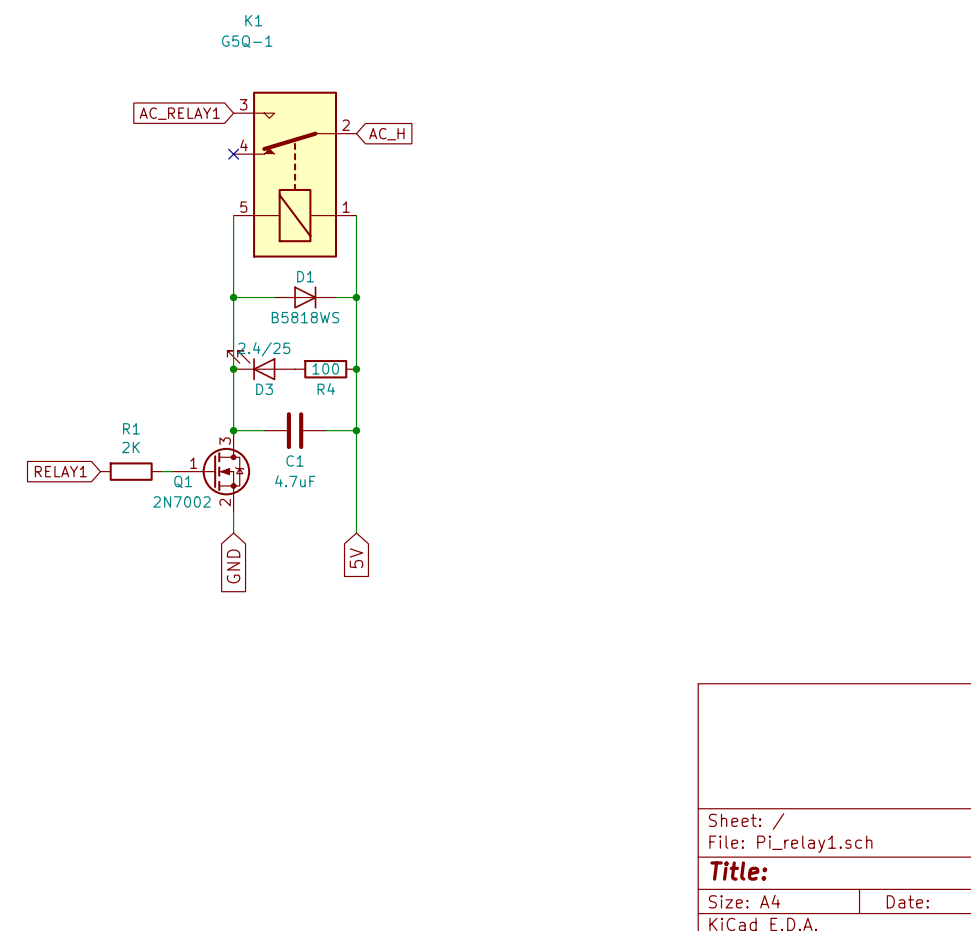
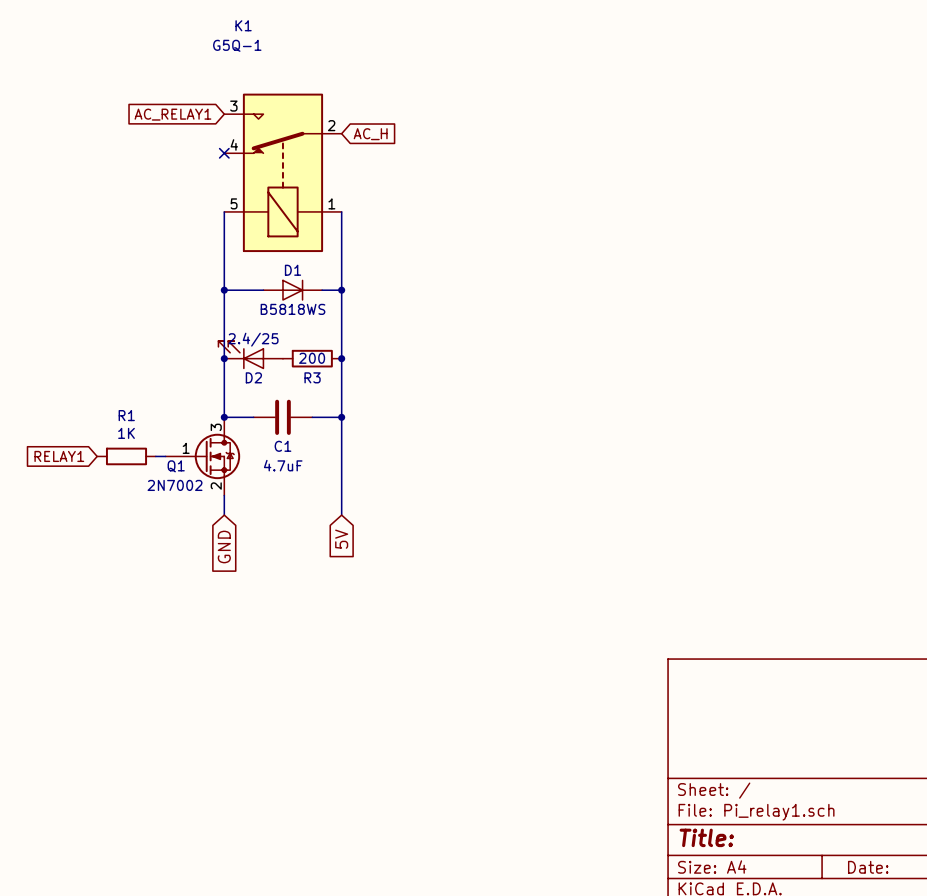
R4 value: 100 (325, 368) -> 200 (312, 358)
D3 name: D3 (264, 389) -> D2 (253, 377)
R4 name: R4 (326, 389) -> R3 (312, 377)
R1 value: 2K (130, 447) -> 1K (126, 433)

